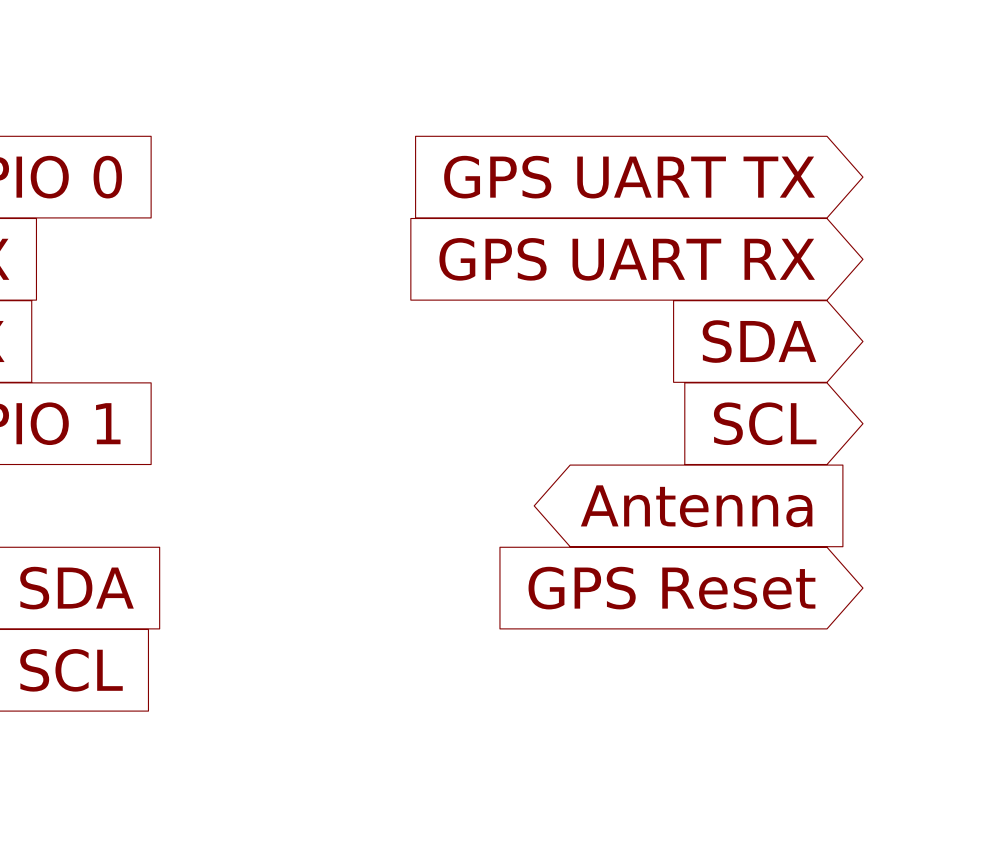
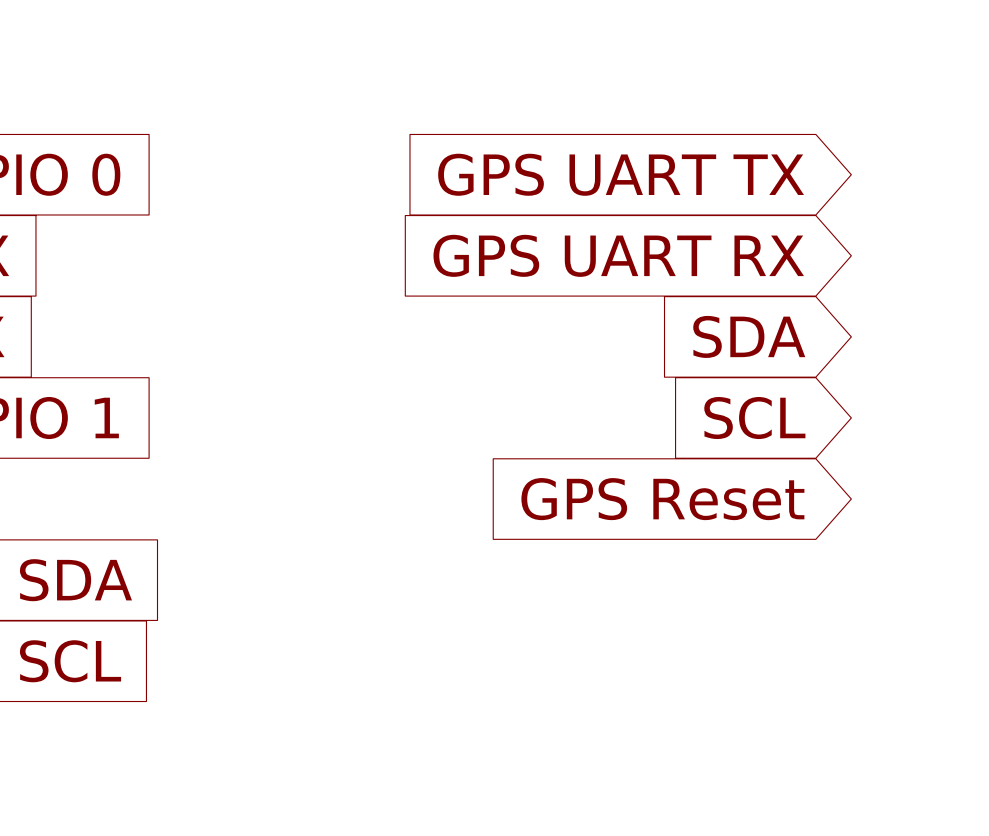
global label: Antenna (696, 506) -> none
global label position: GPS Reset (671, 588) -> GPS Reset (662, 499)

